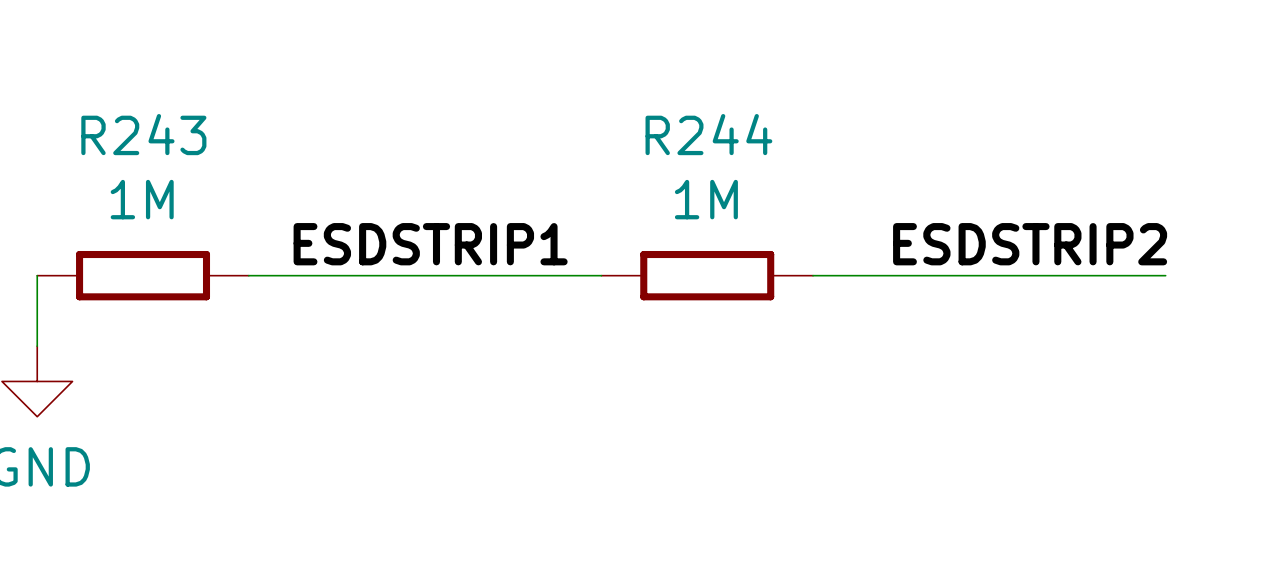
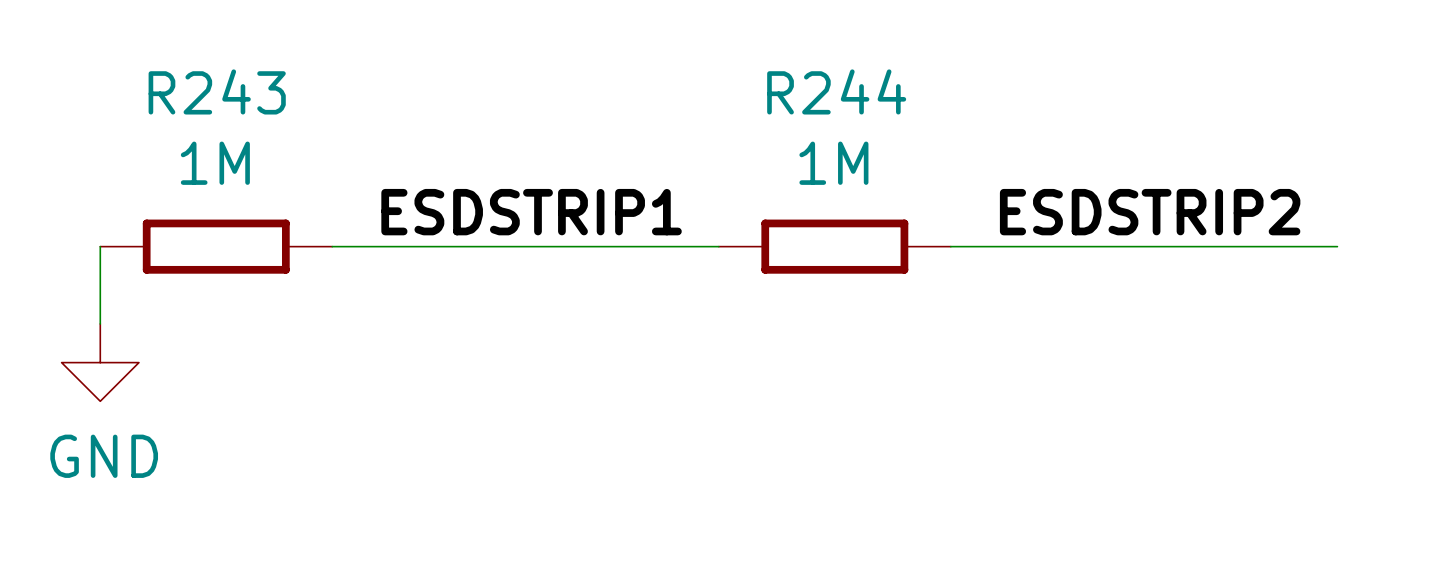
label position: ESDSTRIP2 (1030, 244) -> ESDSTRIP2 (1150, 212)

